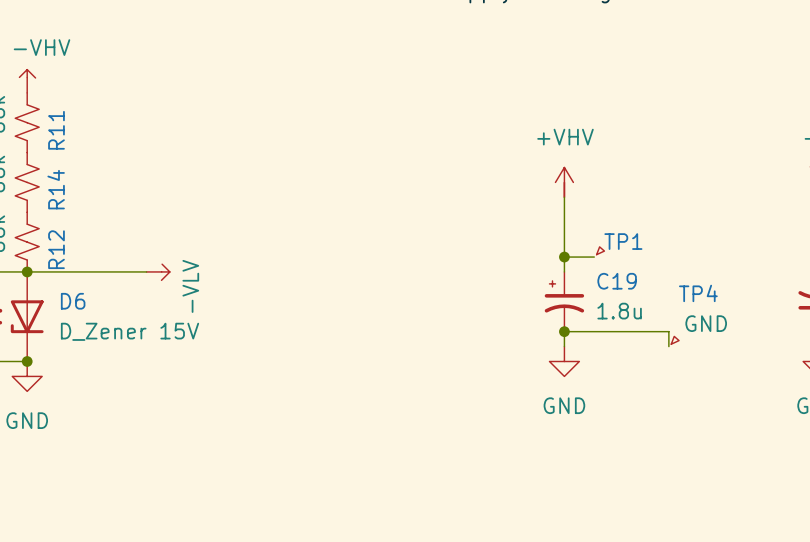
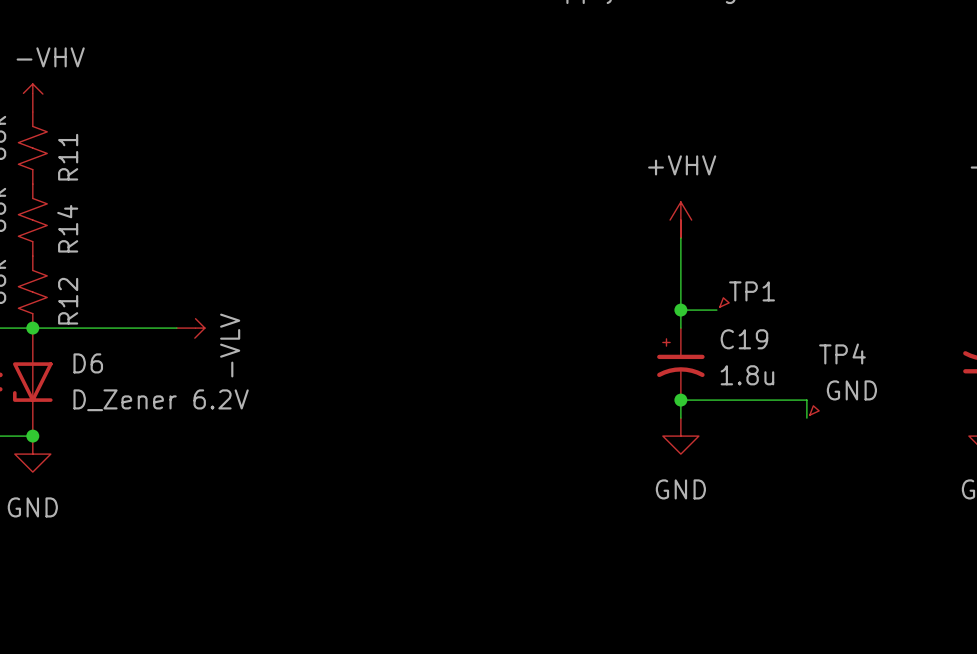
D6 value: D_Zener 15V (130, 331) -> D_Zener 6.2V (161, 400)

